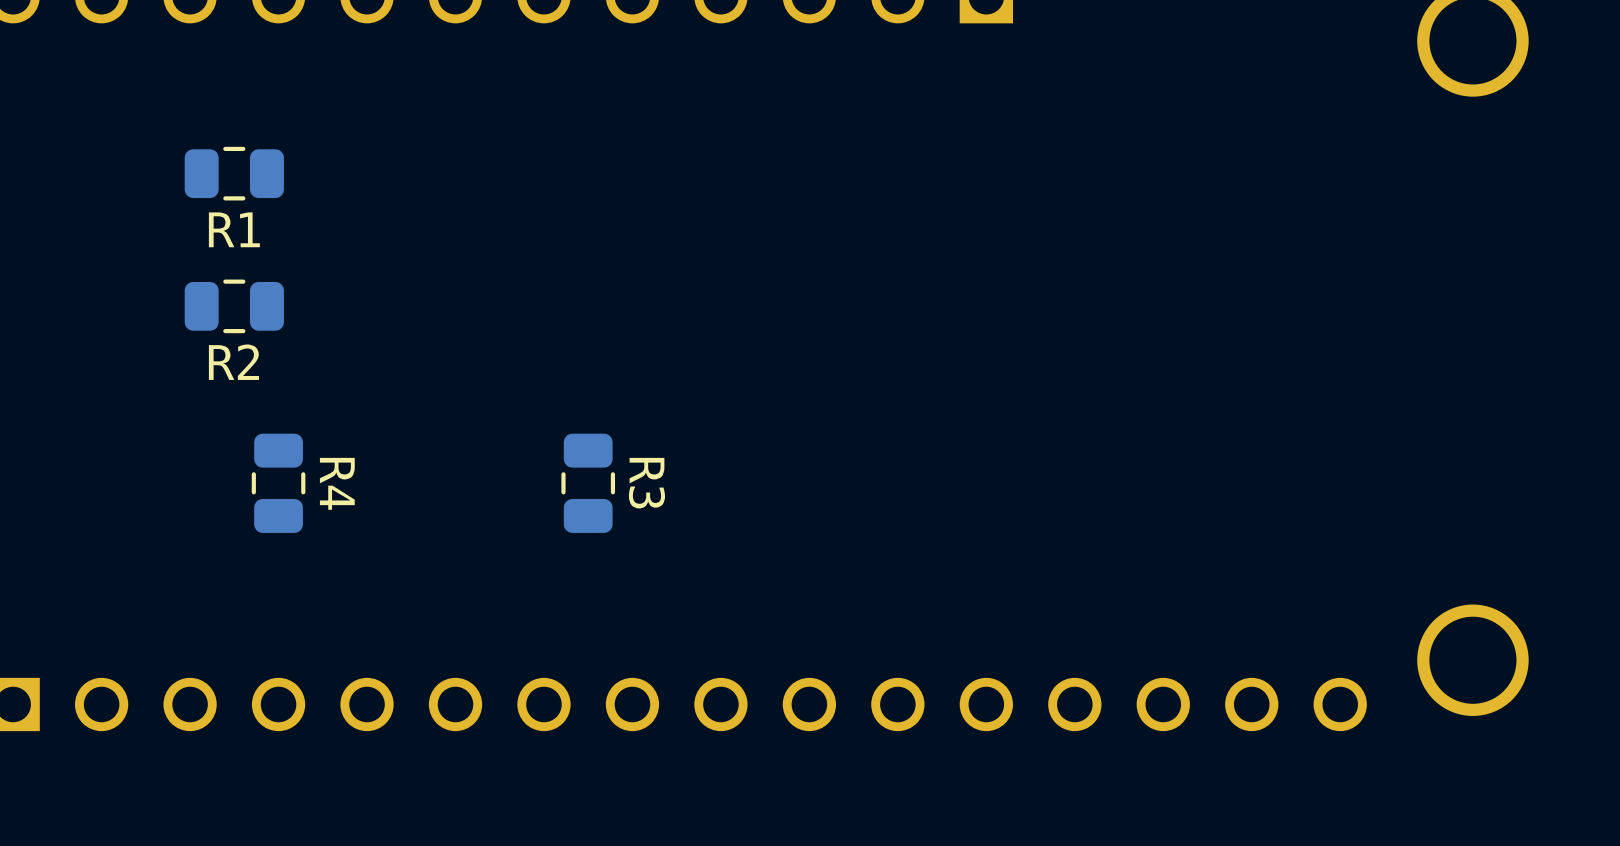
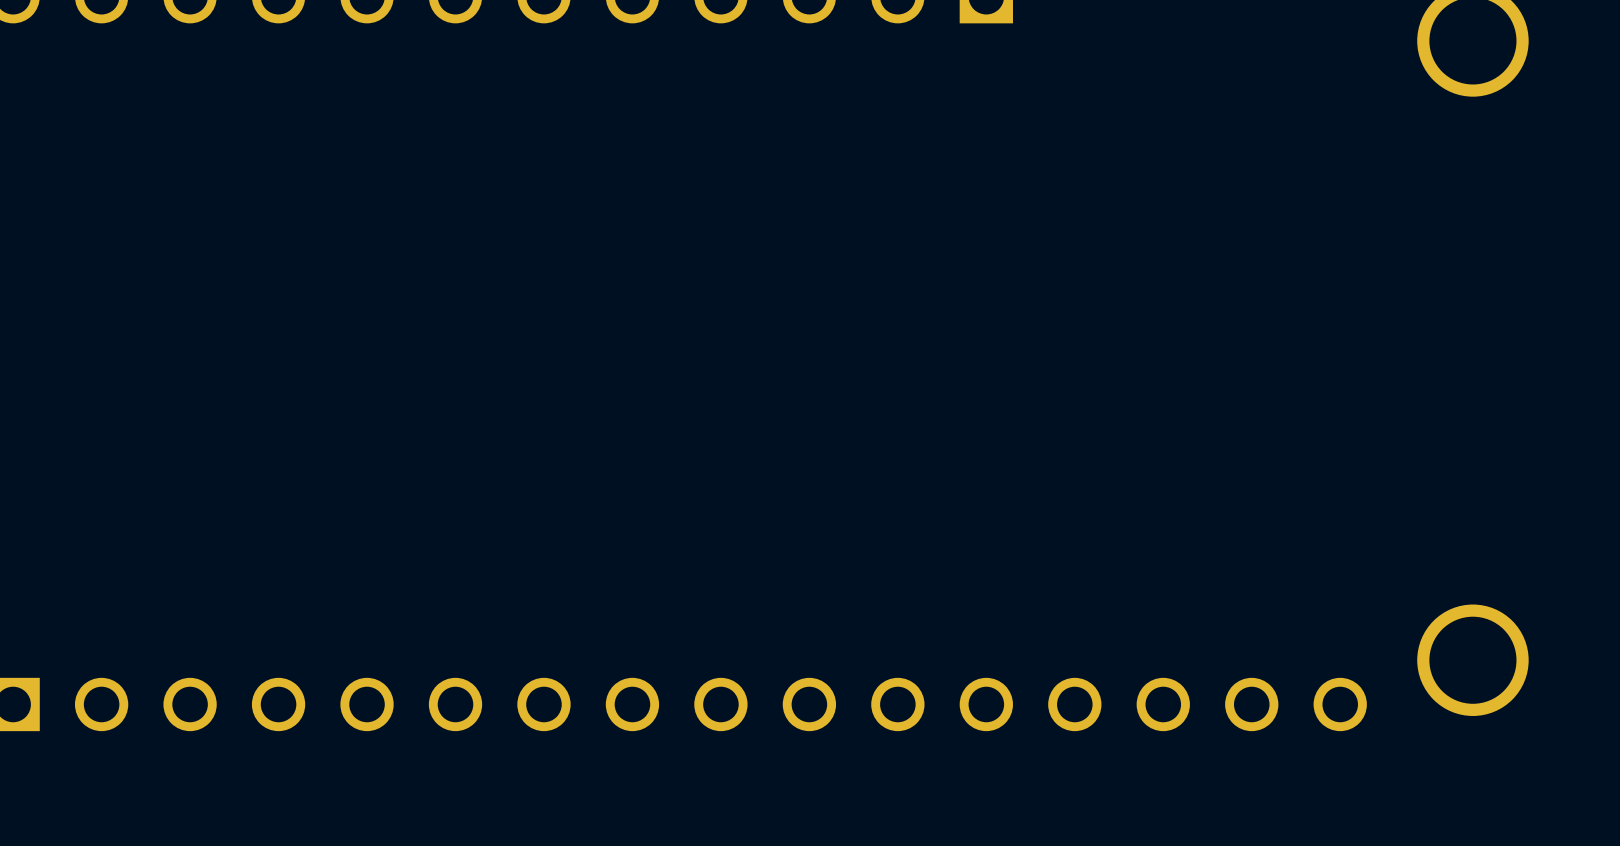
R1: (234, 173) -> none
R2: (234, 306) -> none
R4: (278, 483) -> none
R3: (588, 483) -> none

